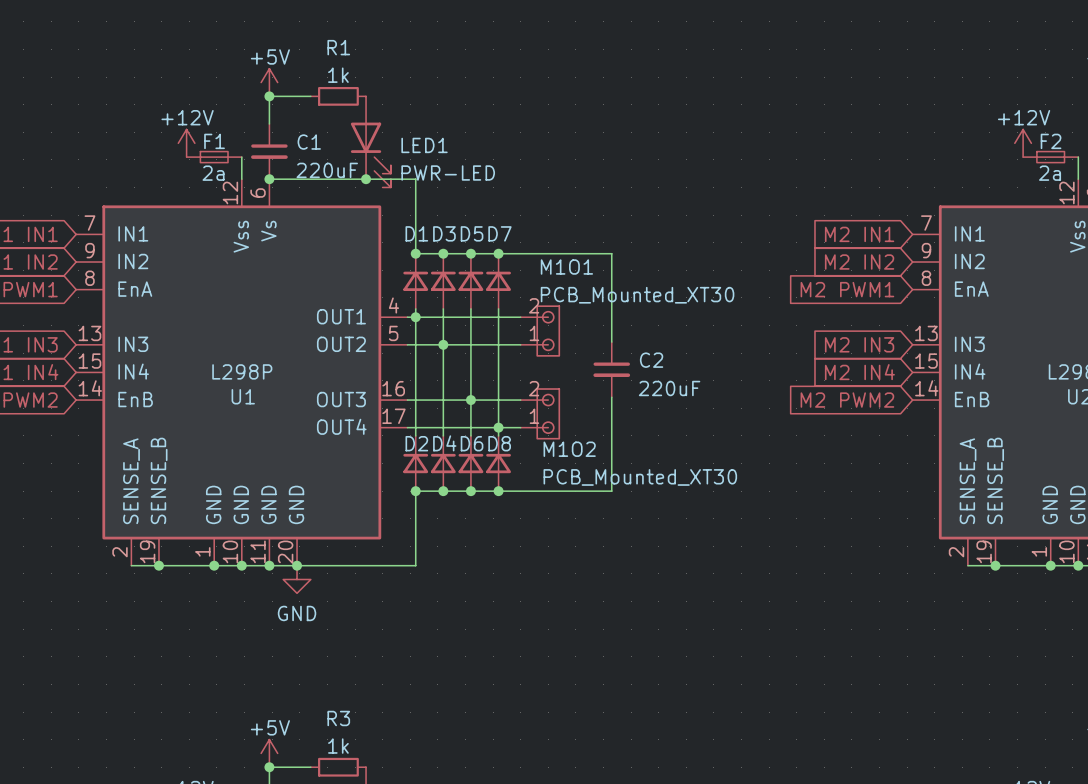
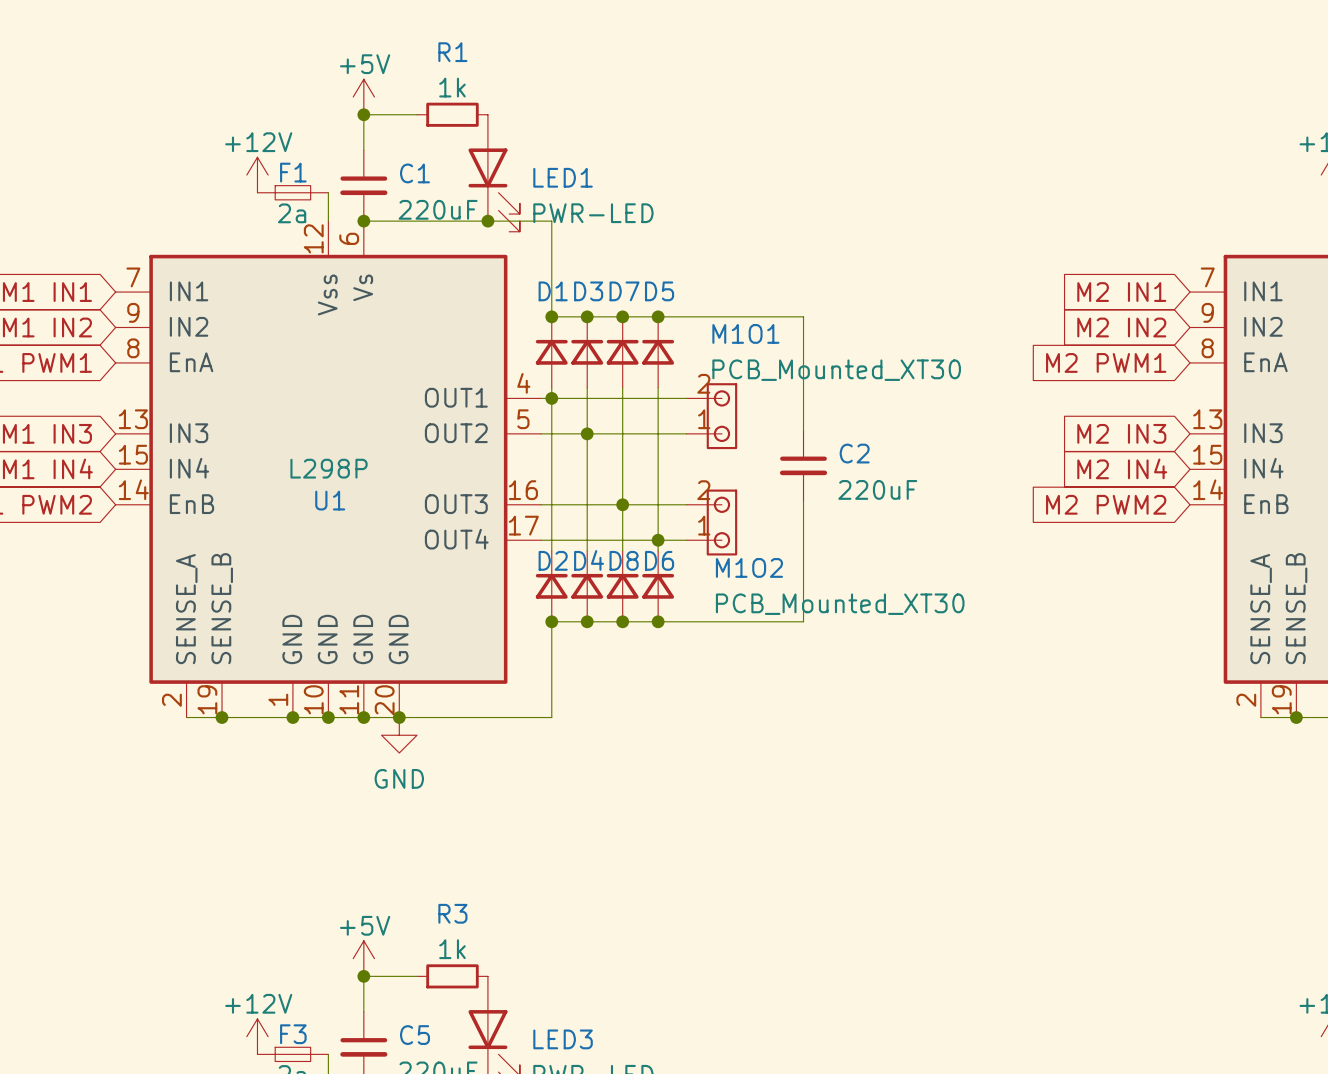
D5 name: D5 (472, 233) -> D7 (624, 291)
D7 name: D7 (499, 233) -> D5 (659, 291)
D6 name: D6 (472, 443) -> D8 (624, 560)
D8 name: D8 (499, 443) -> D6 (659, 560)

